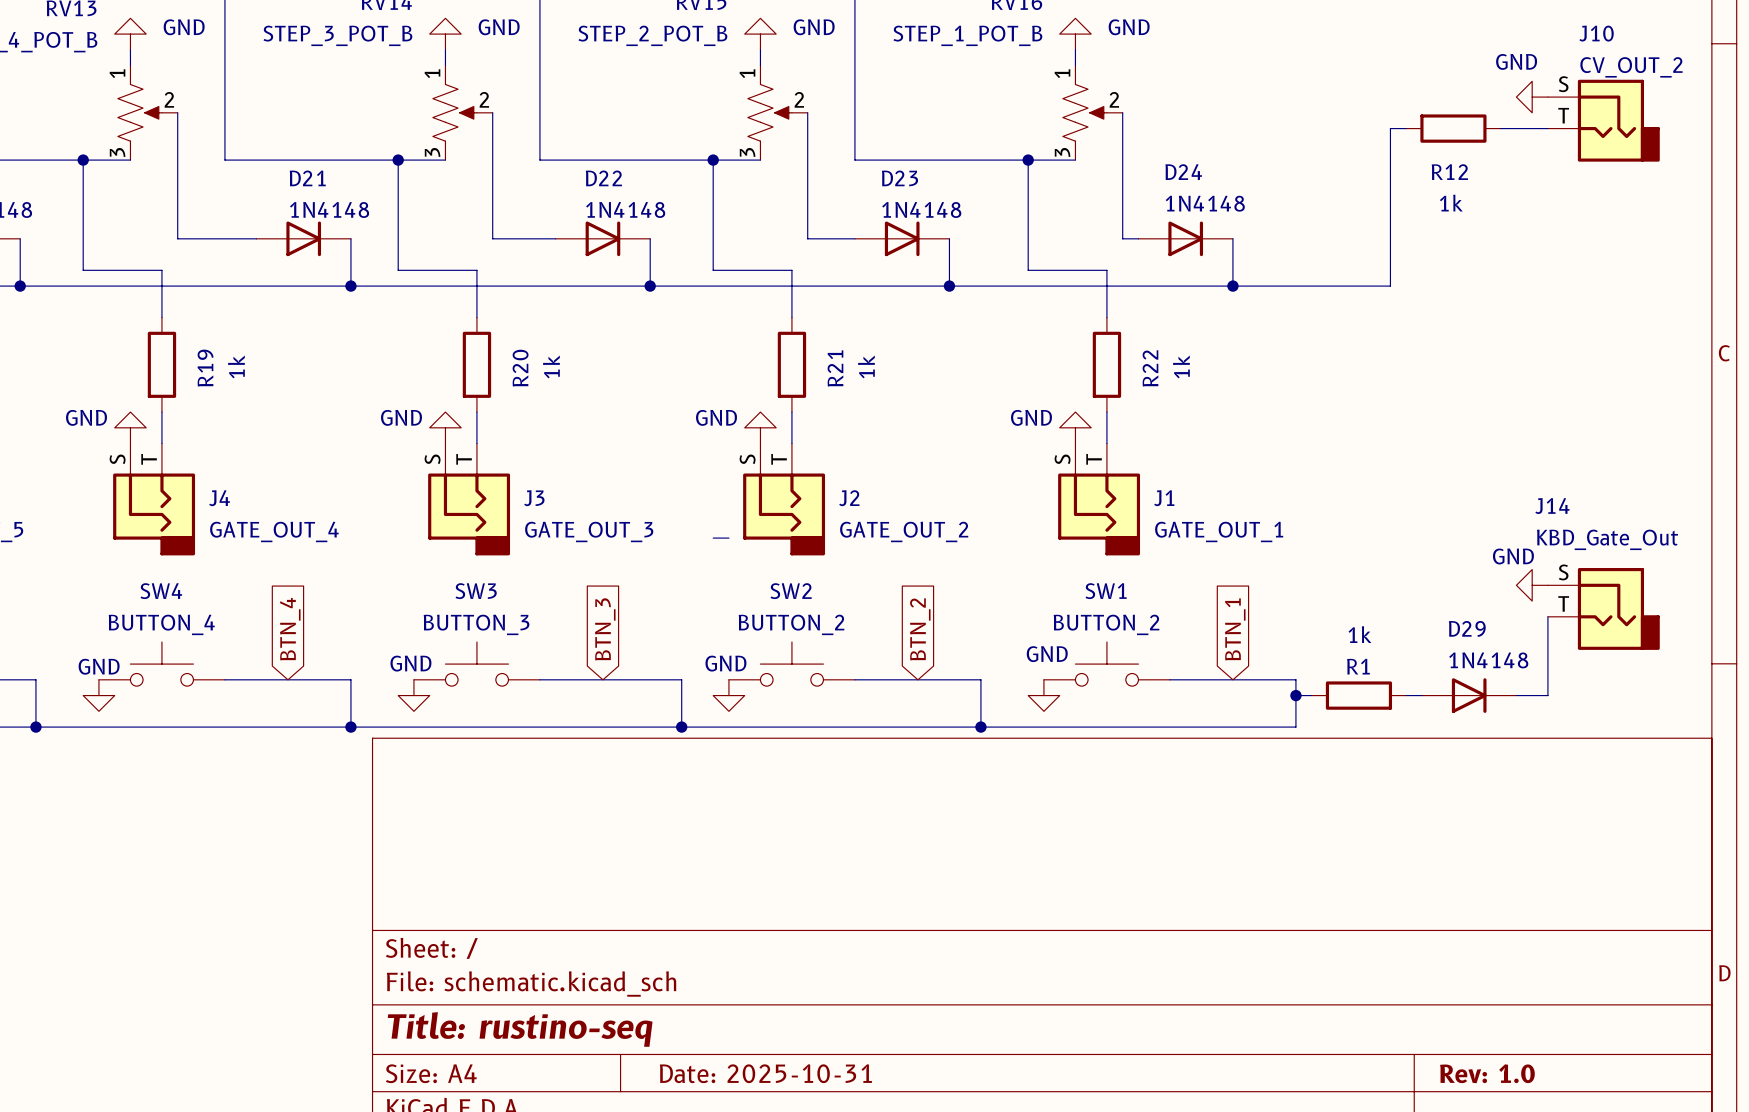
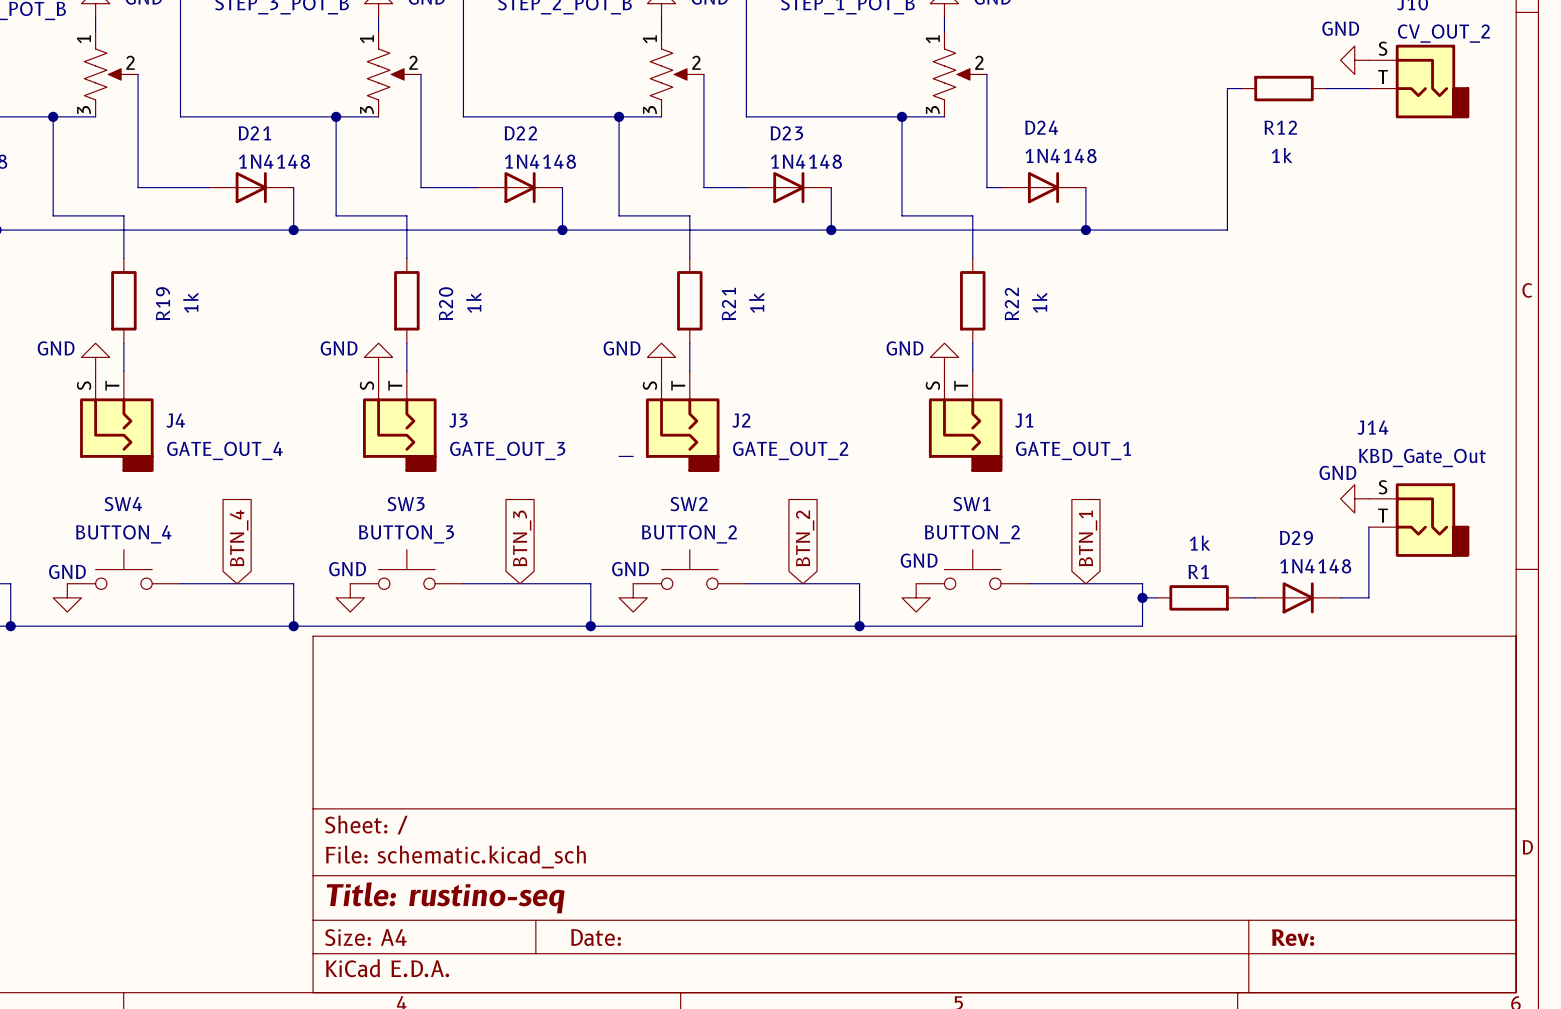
title block: Date: 2025-10-31 (765, 1073) -> Date: (596, 937)
title block: Rev: 1.0 (1487, 1073) -> Rev: (1293, 937)

